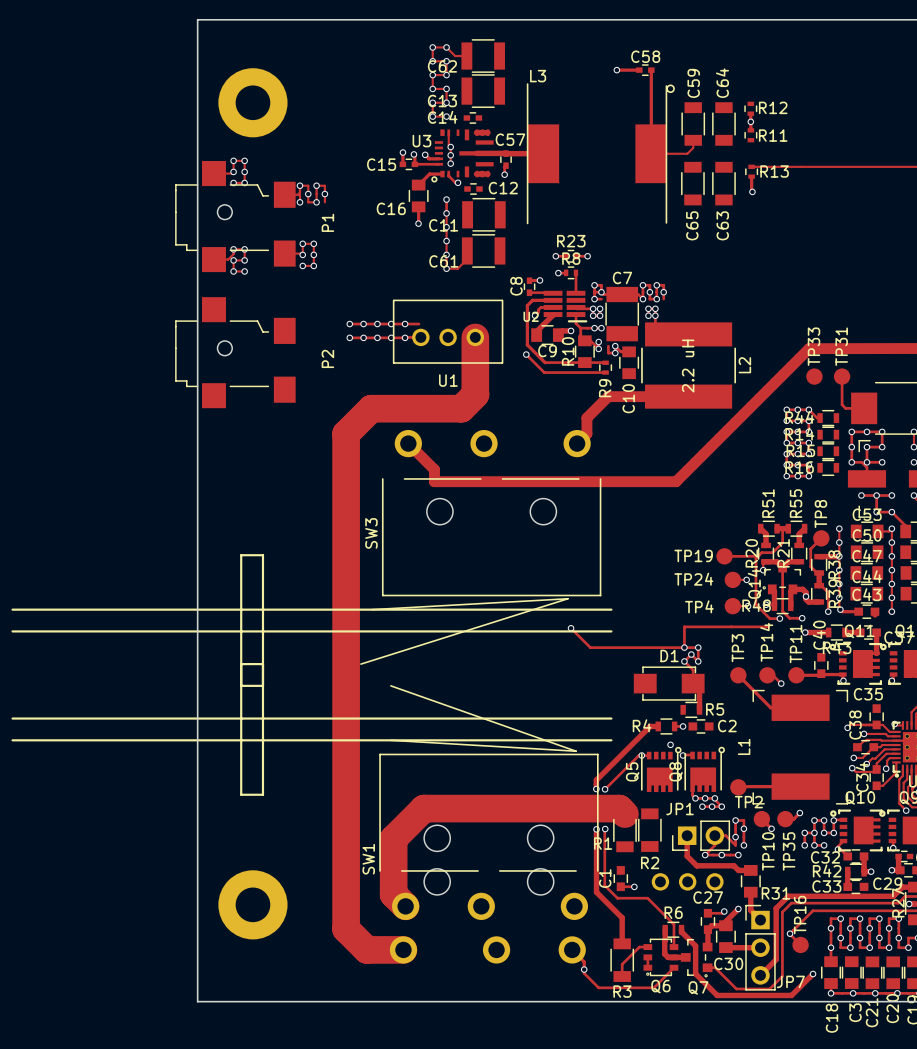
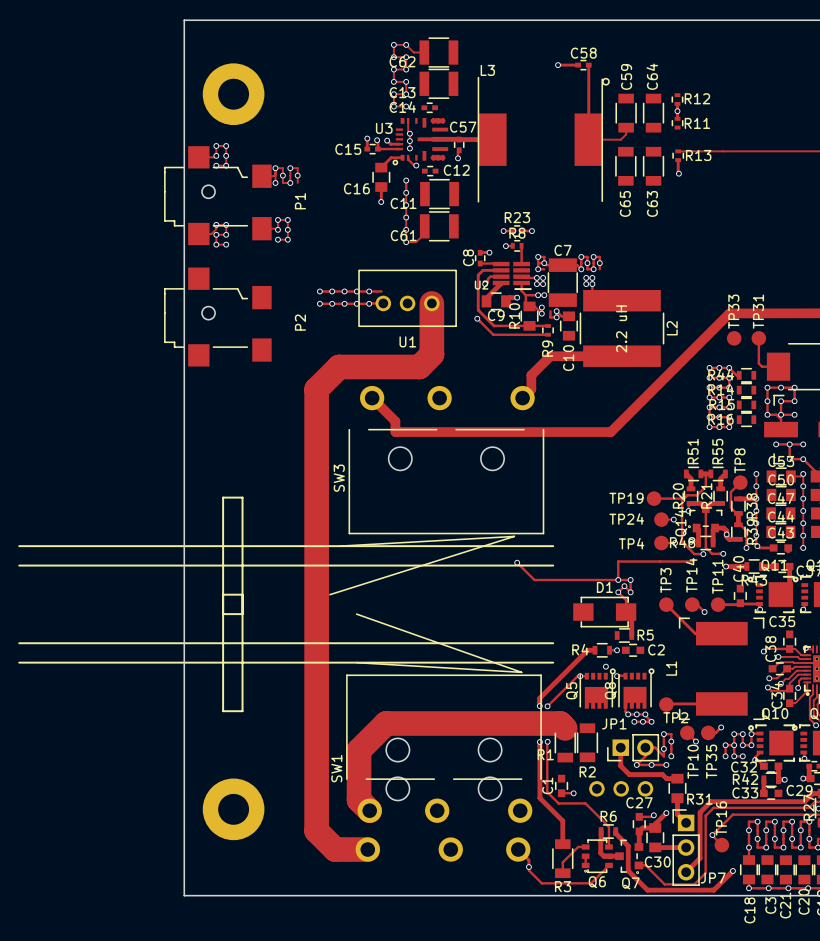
Q11 footprint: [829, 642, 883, 685] -> [747, 575, 795, 614]
Q10 footprint: [830, 809, 883, 852] -> [748, 724, 796, 762]

